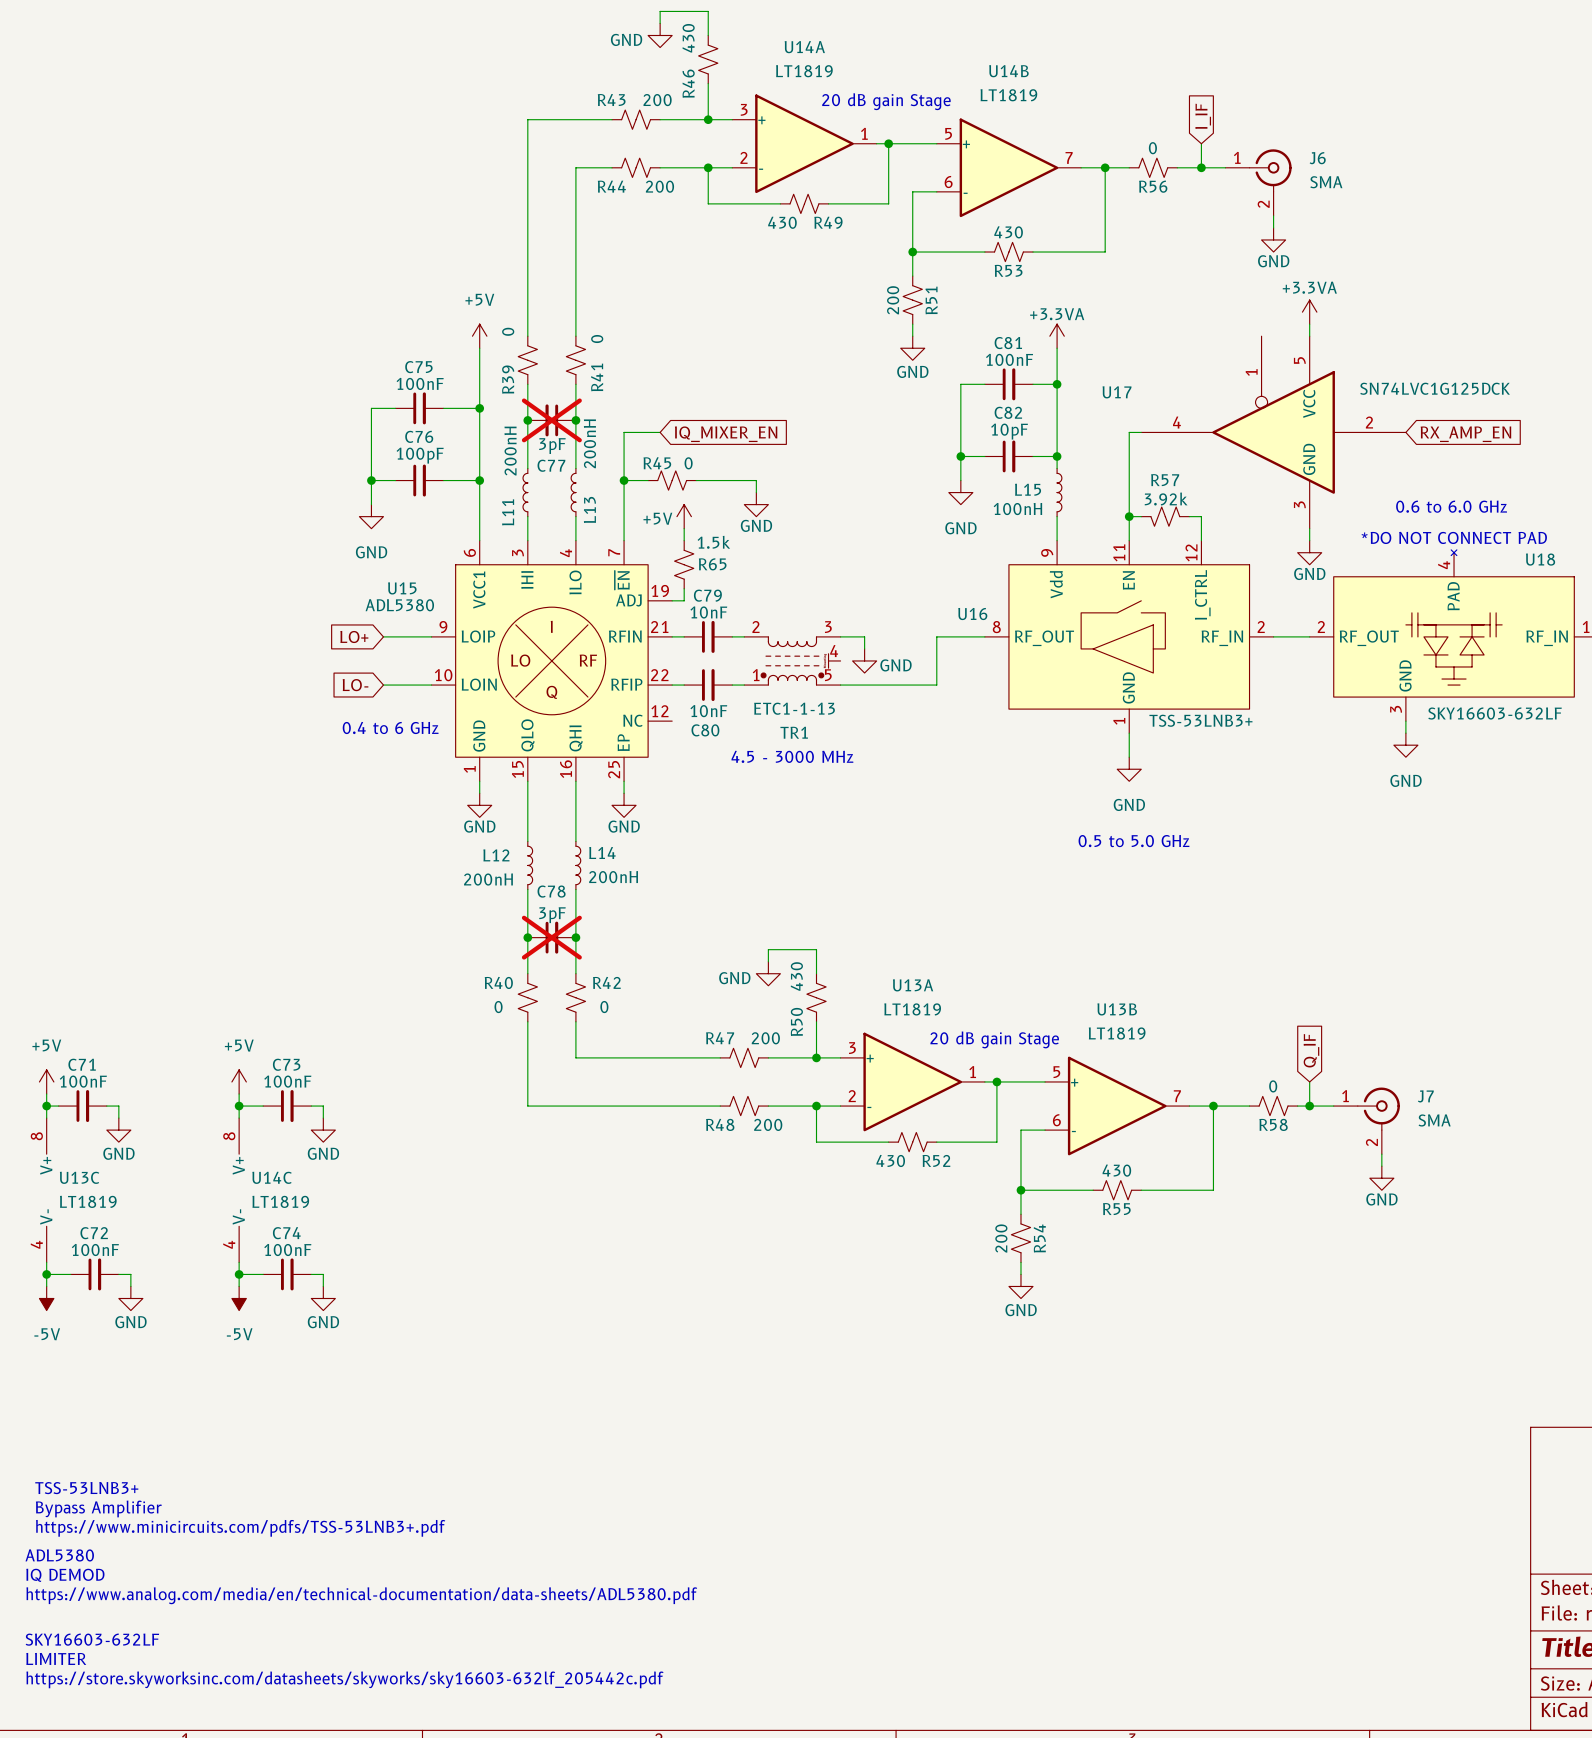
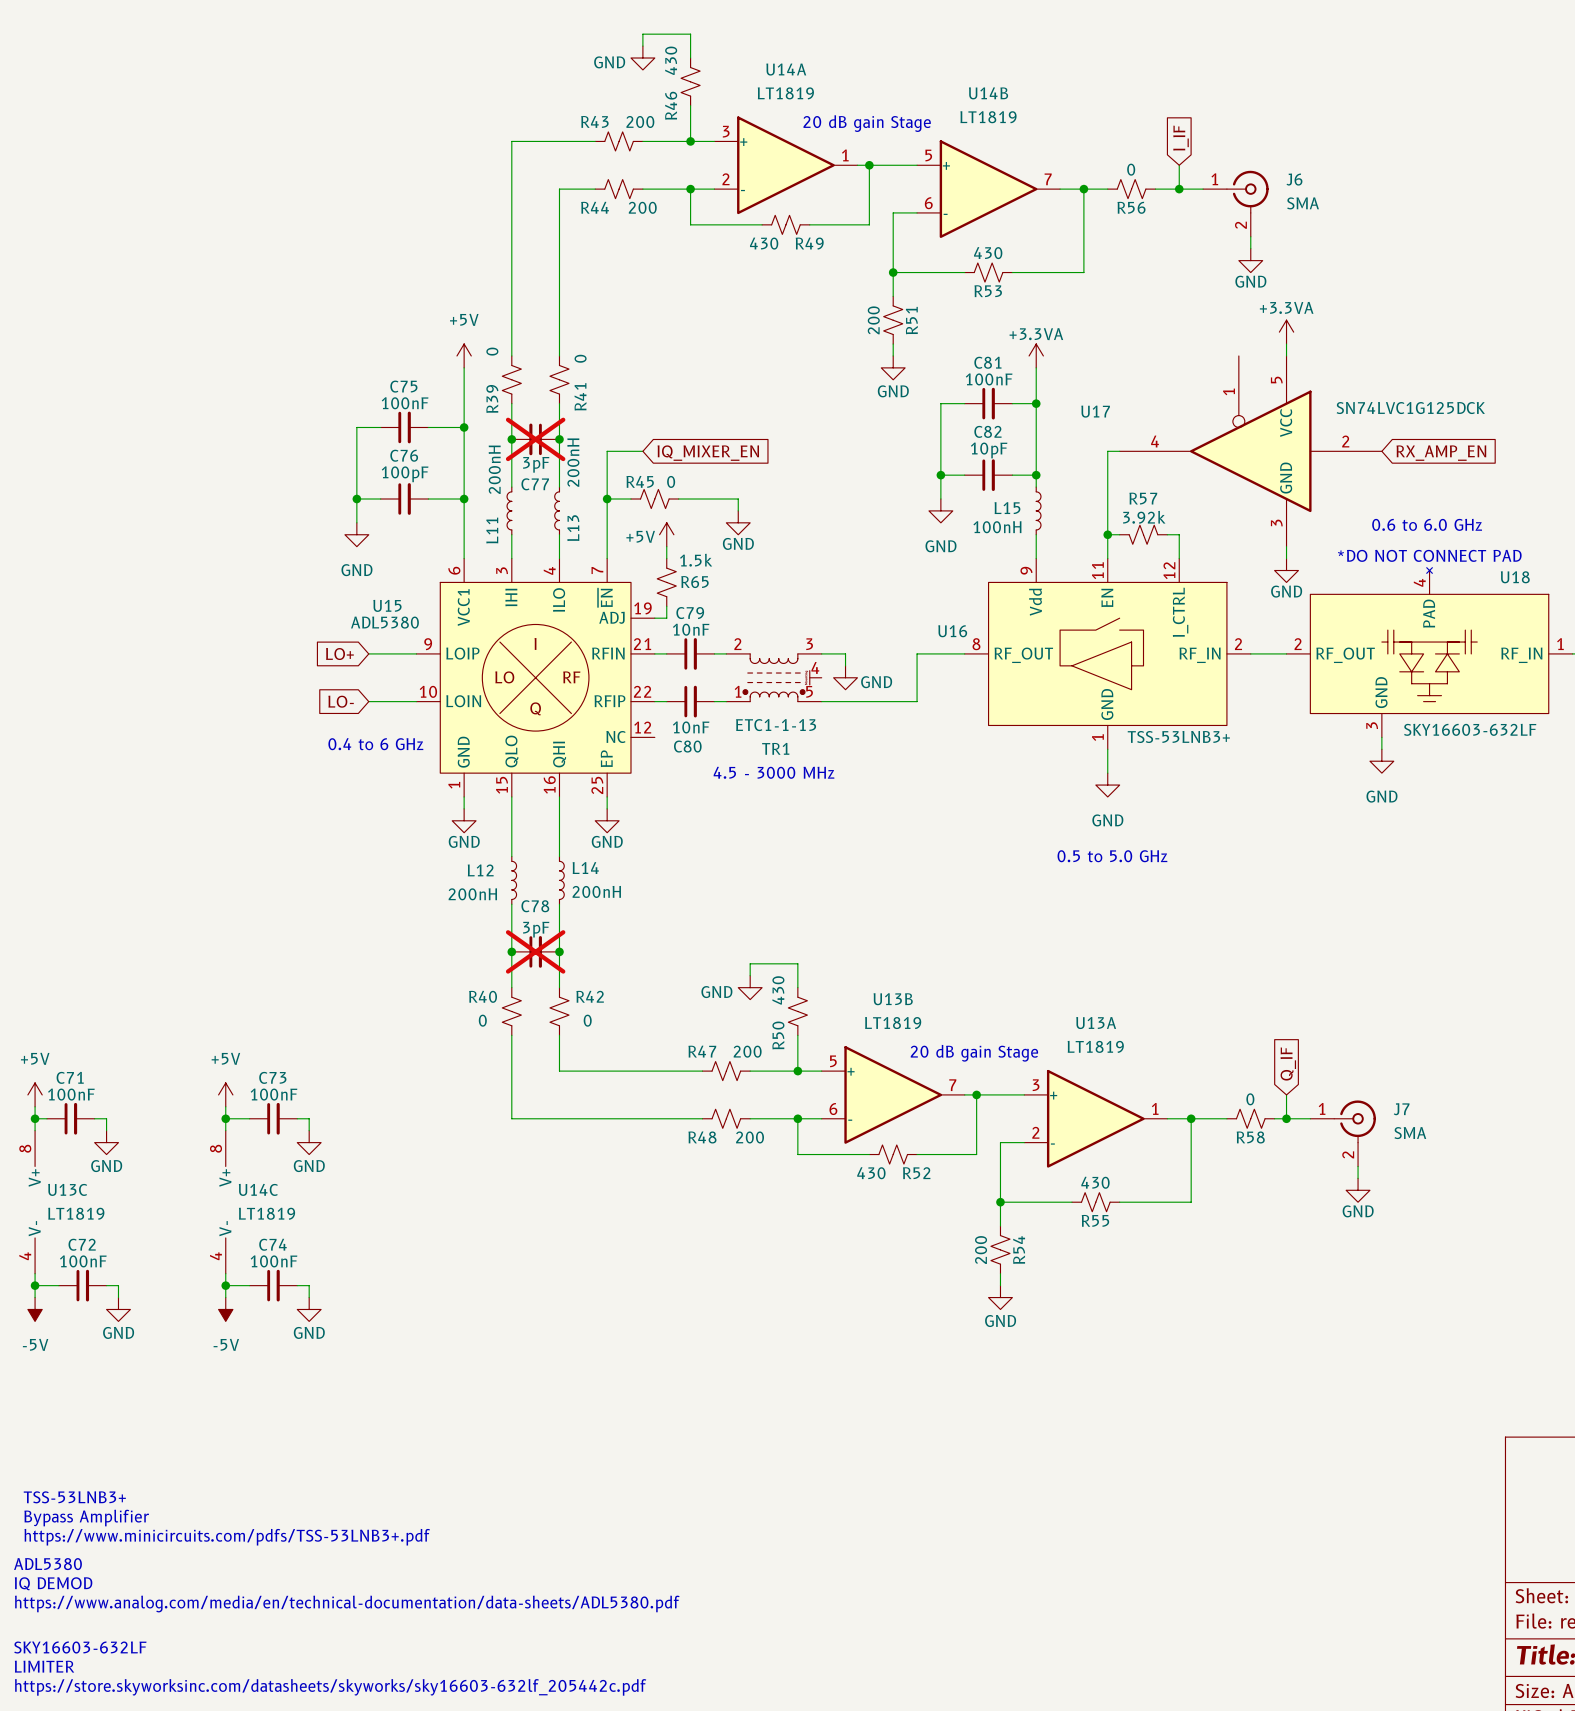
U13A position: (912, 1081) -> (1095, 1118)
U13B position: (1117, 1106) -> (893, 1094)

